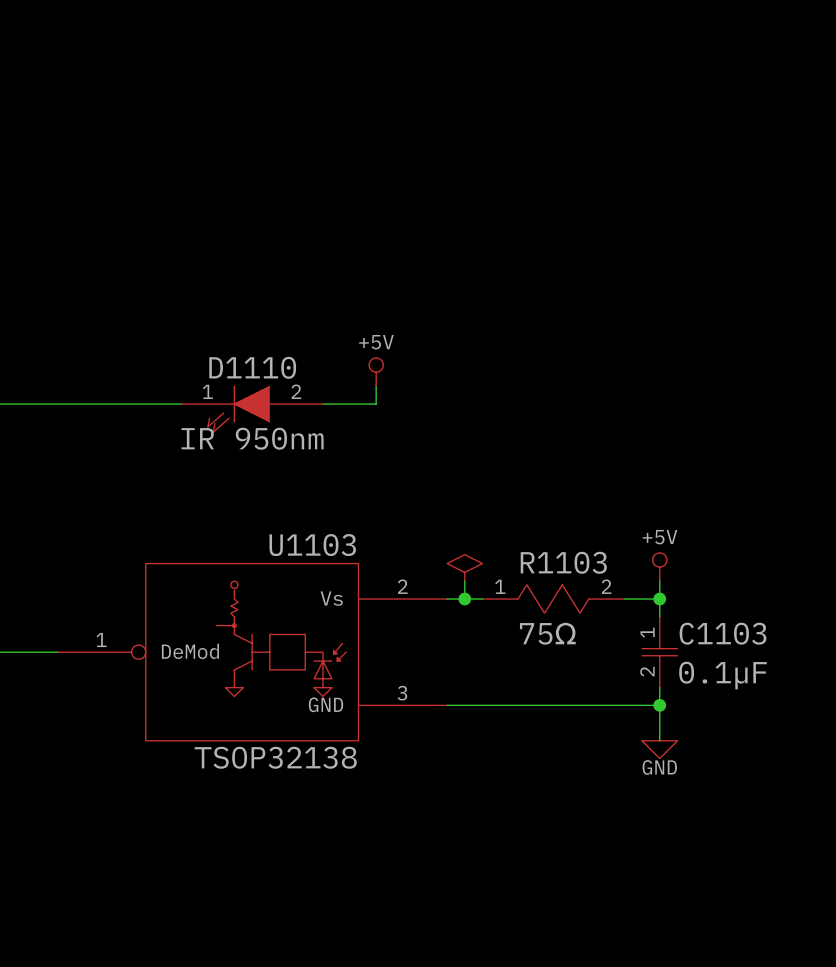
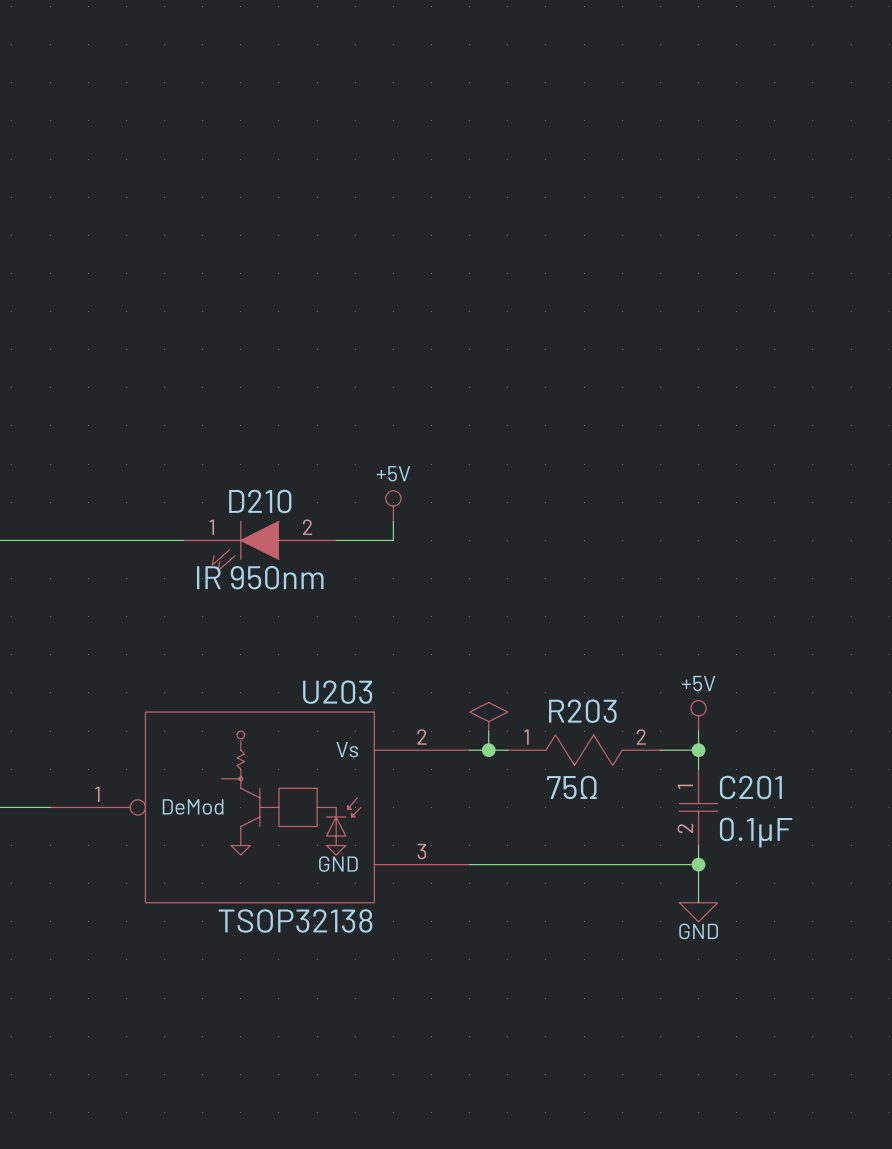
D1110 name: D1110 (252, 367) -> D210 (260, 501)
U1103 name: U1103 (312, 545) -> U203 (337, 692)
R1103 name: R1103 (563, 562) -> R203 (582, 711)
C1103 name: C1103 (723, 633) -> C201 (750, 787)

